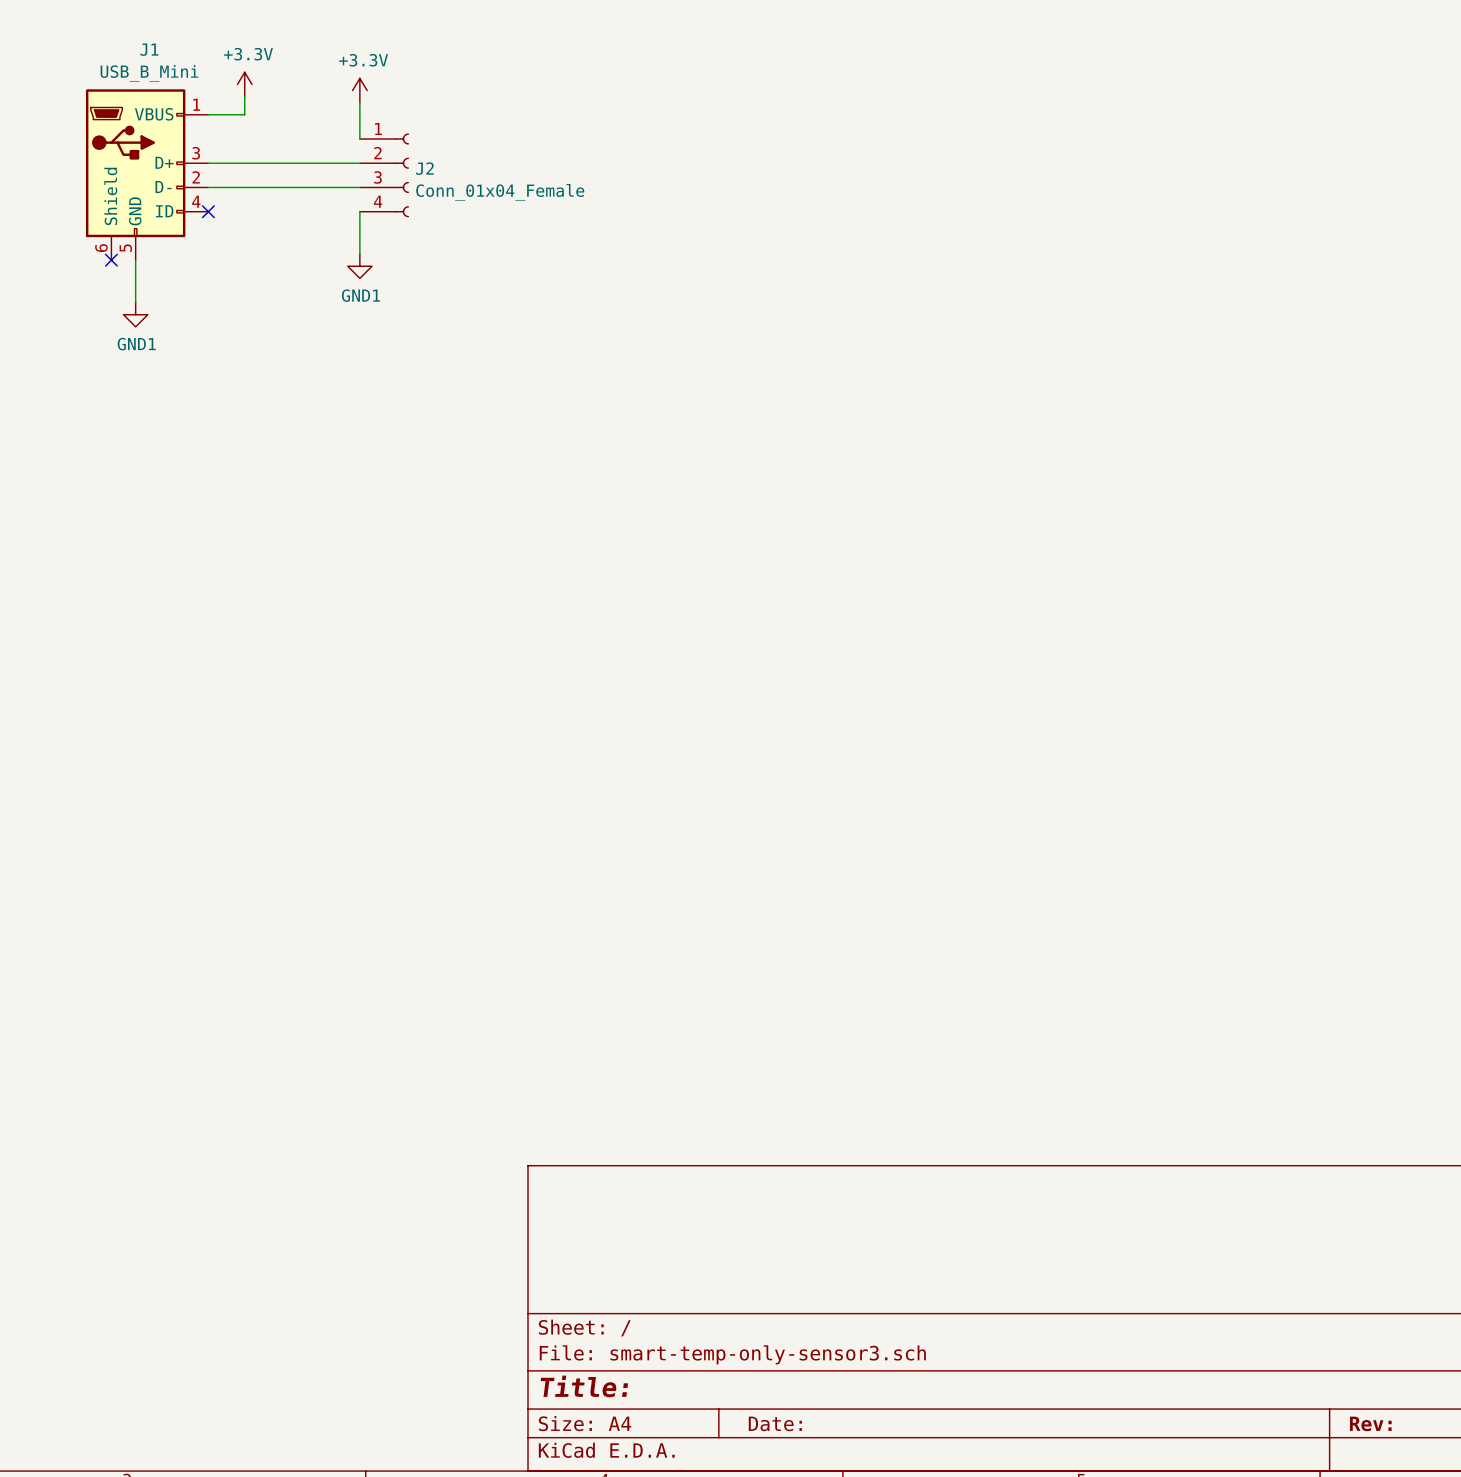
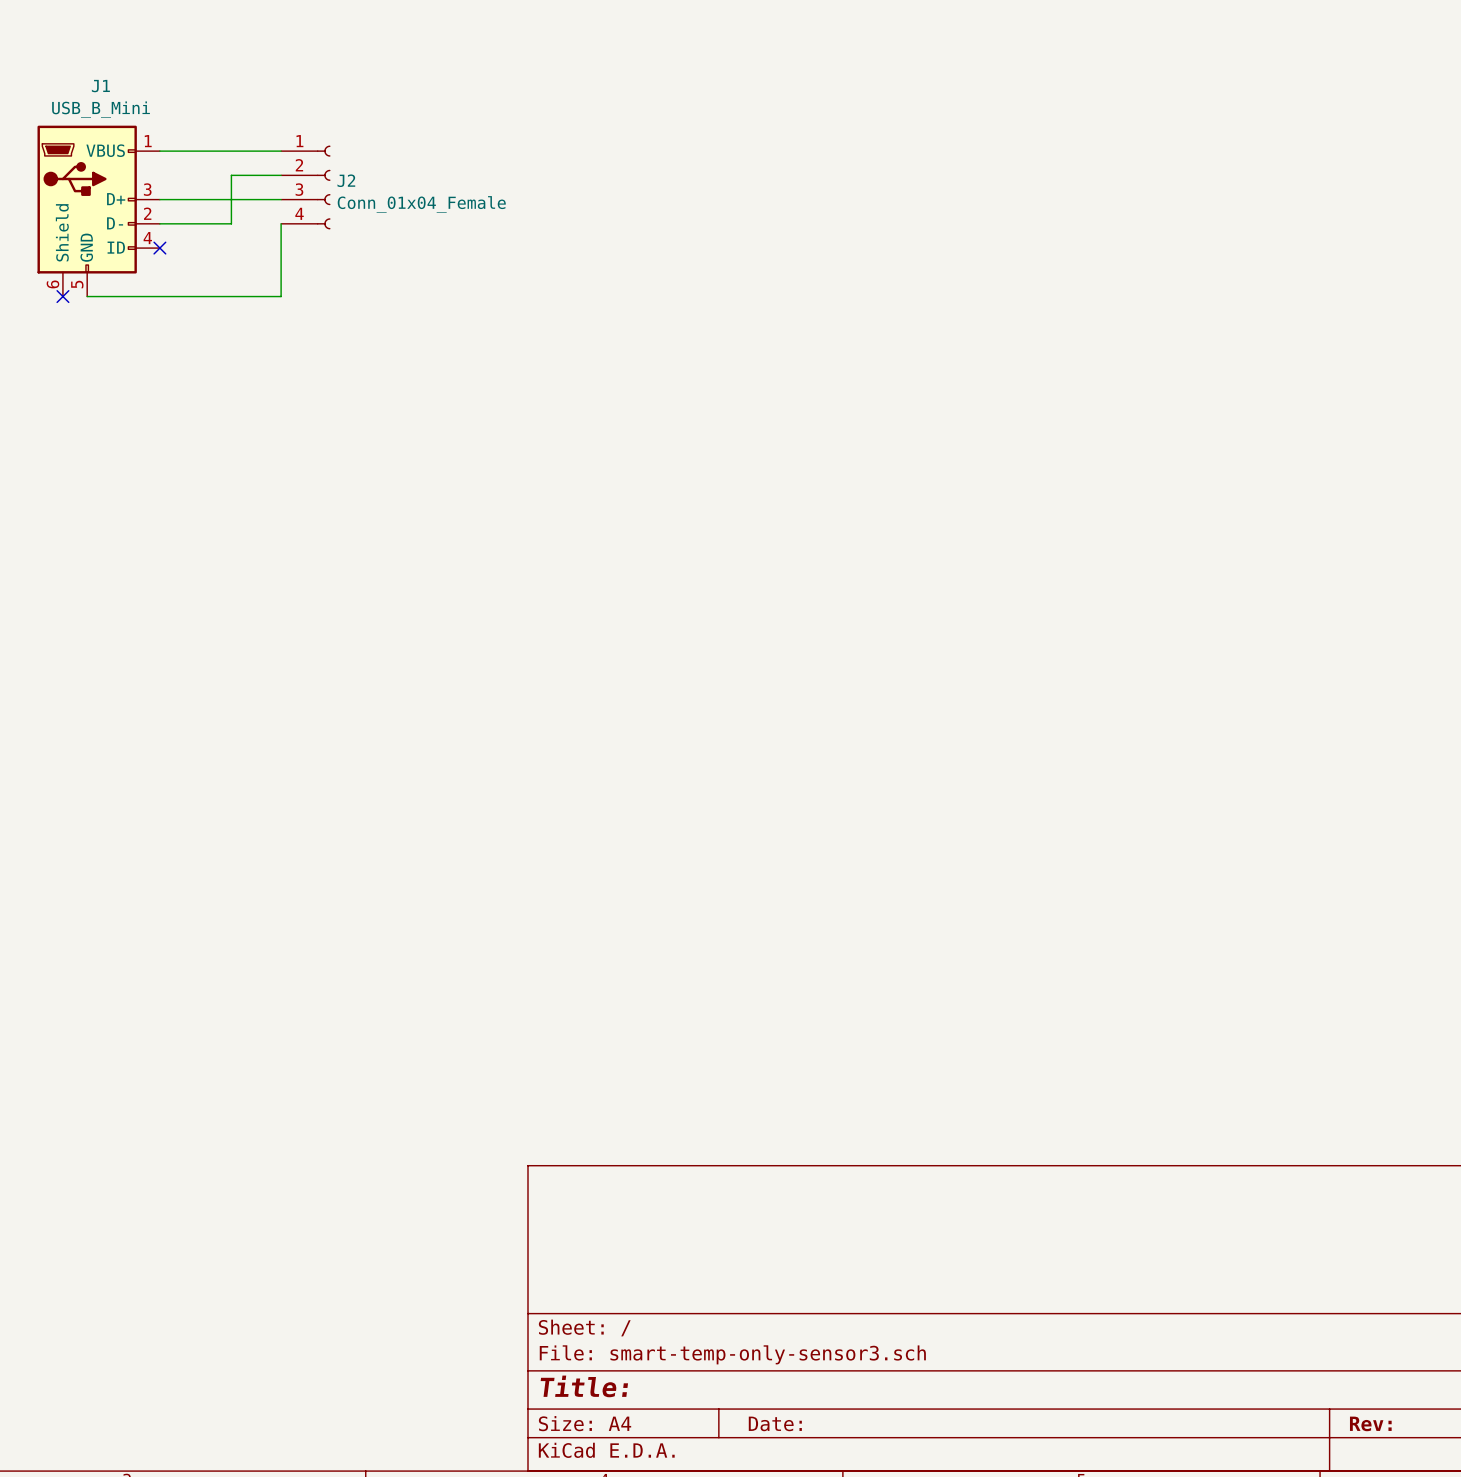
power symbol: +3.3V (244, 84) -> none
power symbol: +3.3V (359, 90) -> none
wire: (244, 96) (244, 114) (208, 114) -> none
wire: (359, 102) (359, 138) -> none
wire: none -> (159, 151) (281, 151)
wire: (208, 163) (359, 163) -> none
J1 position: (147, 174) -> (98, 211)
wire: none -> (281, 175) (231, 175) (231, 223) (159, 223)
J2 position: (384, 175) -> (305, 187)
wire: (208, 187) (359, 187) -> none
wire: none -> (159, 199) (281, 199)
no-connect mark: (208, 211) -> none
wire: (359, 211) (359, 254) -> none
wire: none -> (281, 223) (281, 296) (87, 296)
no-connect mark: none -> (159, 248)
no-connect mark: (111, 260) -> none
wire: (135, 260) (135, 302) -> none
power symbol: GND1 (359, 266) -> none
no-connect mark: none -> (62, 296)
power symbol: GND1 (135, 314) -> none

